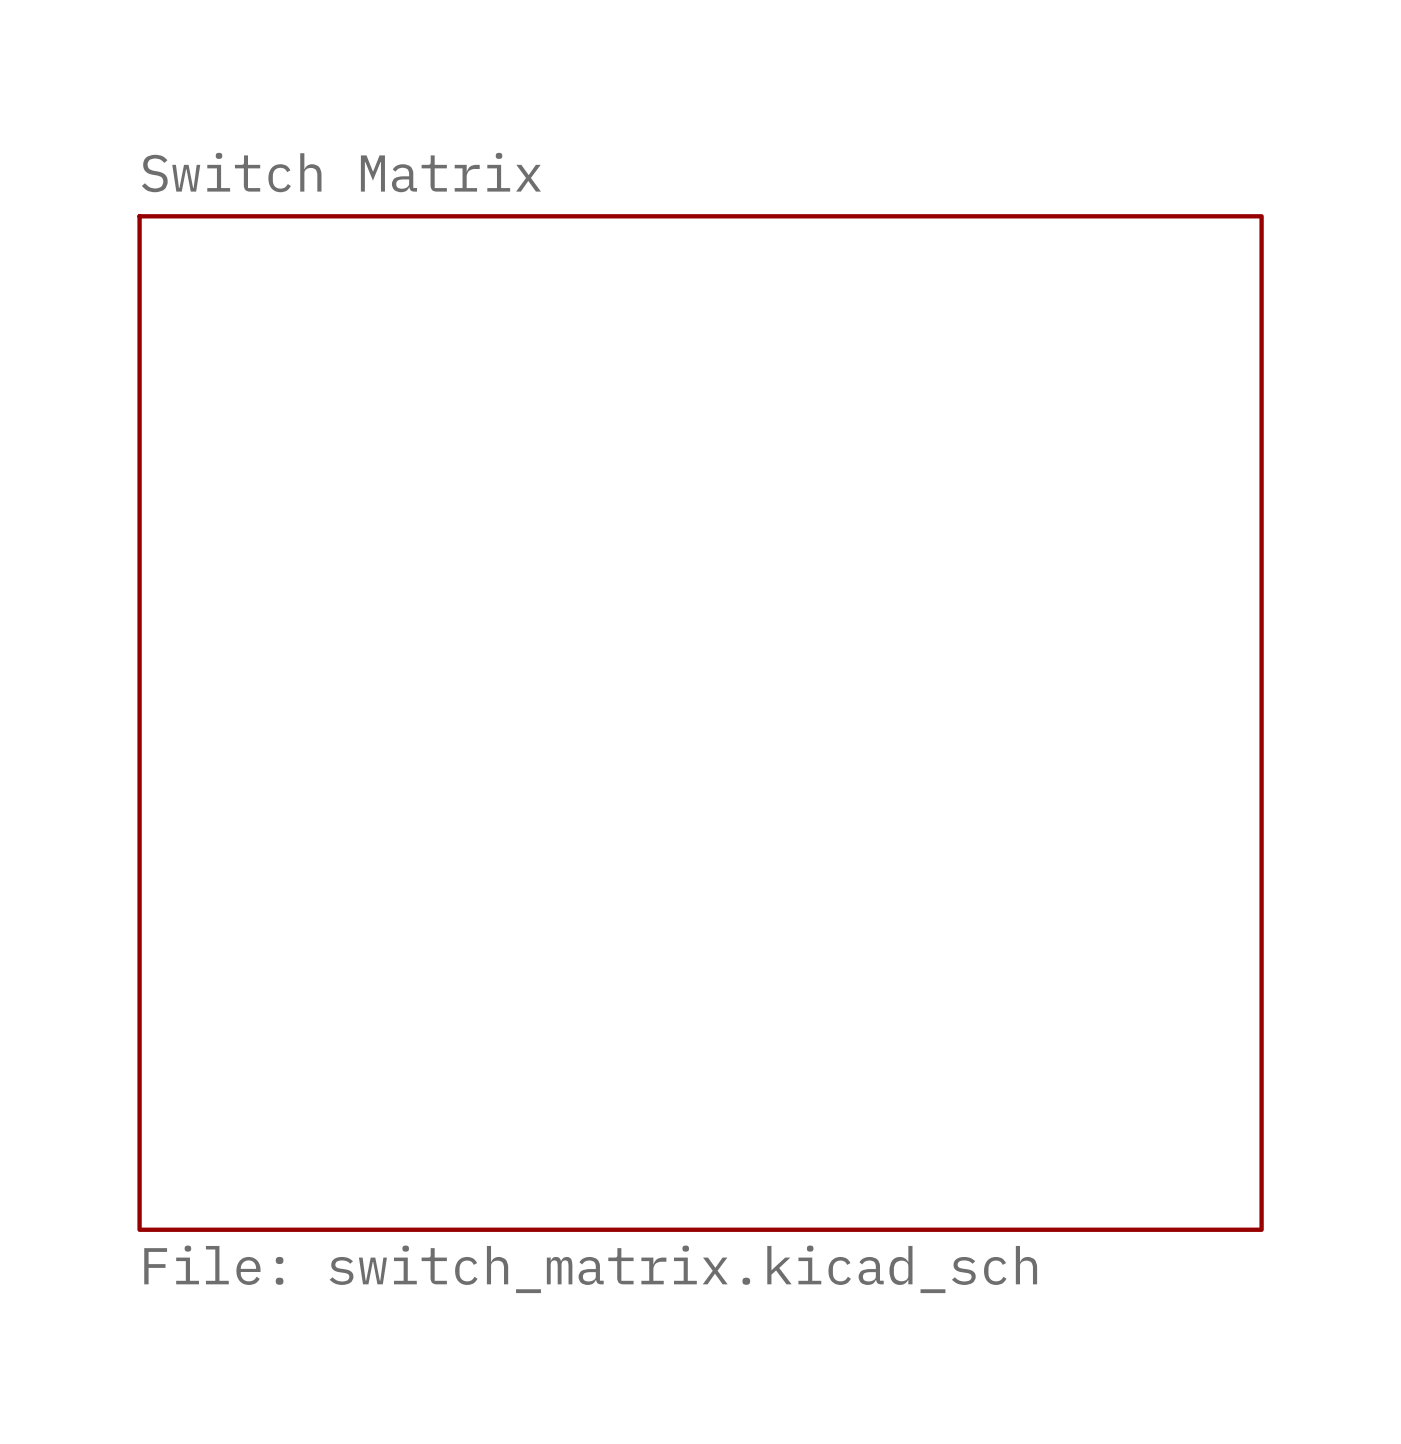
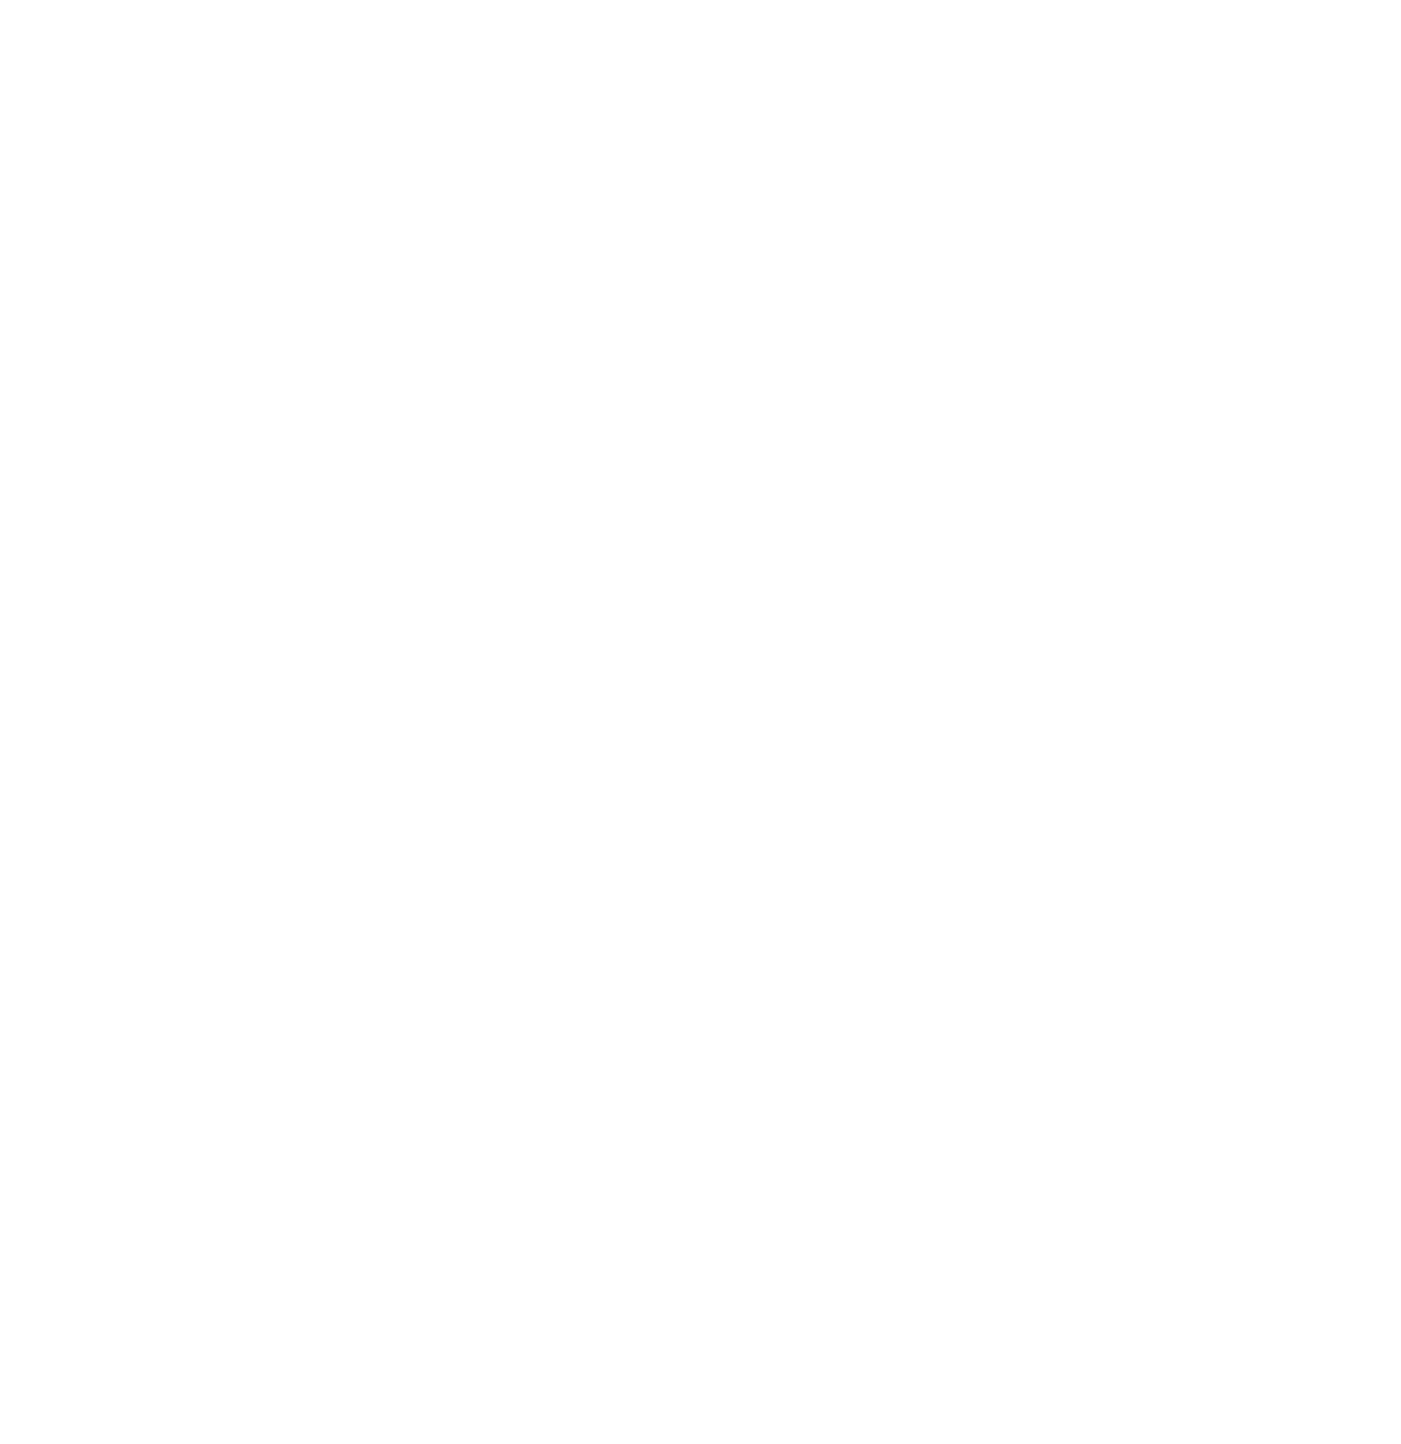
sheet Switch Matrix: File: switch_matrix.kicad_sch (700, 723) -> none

